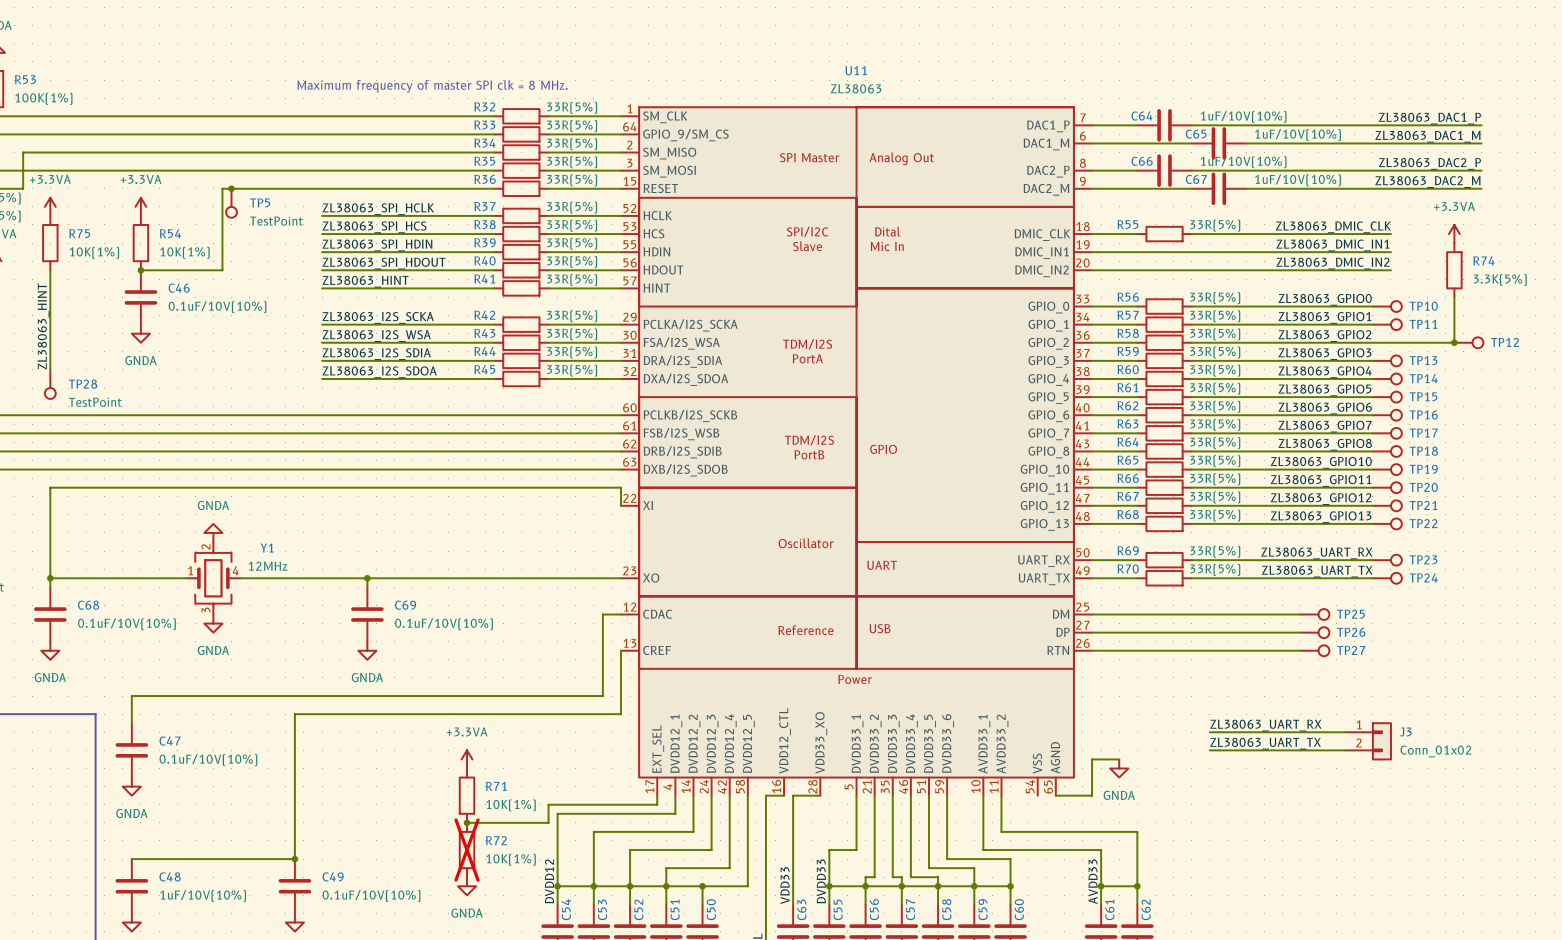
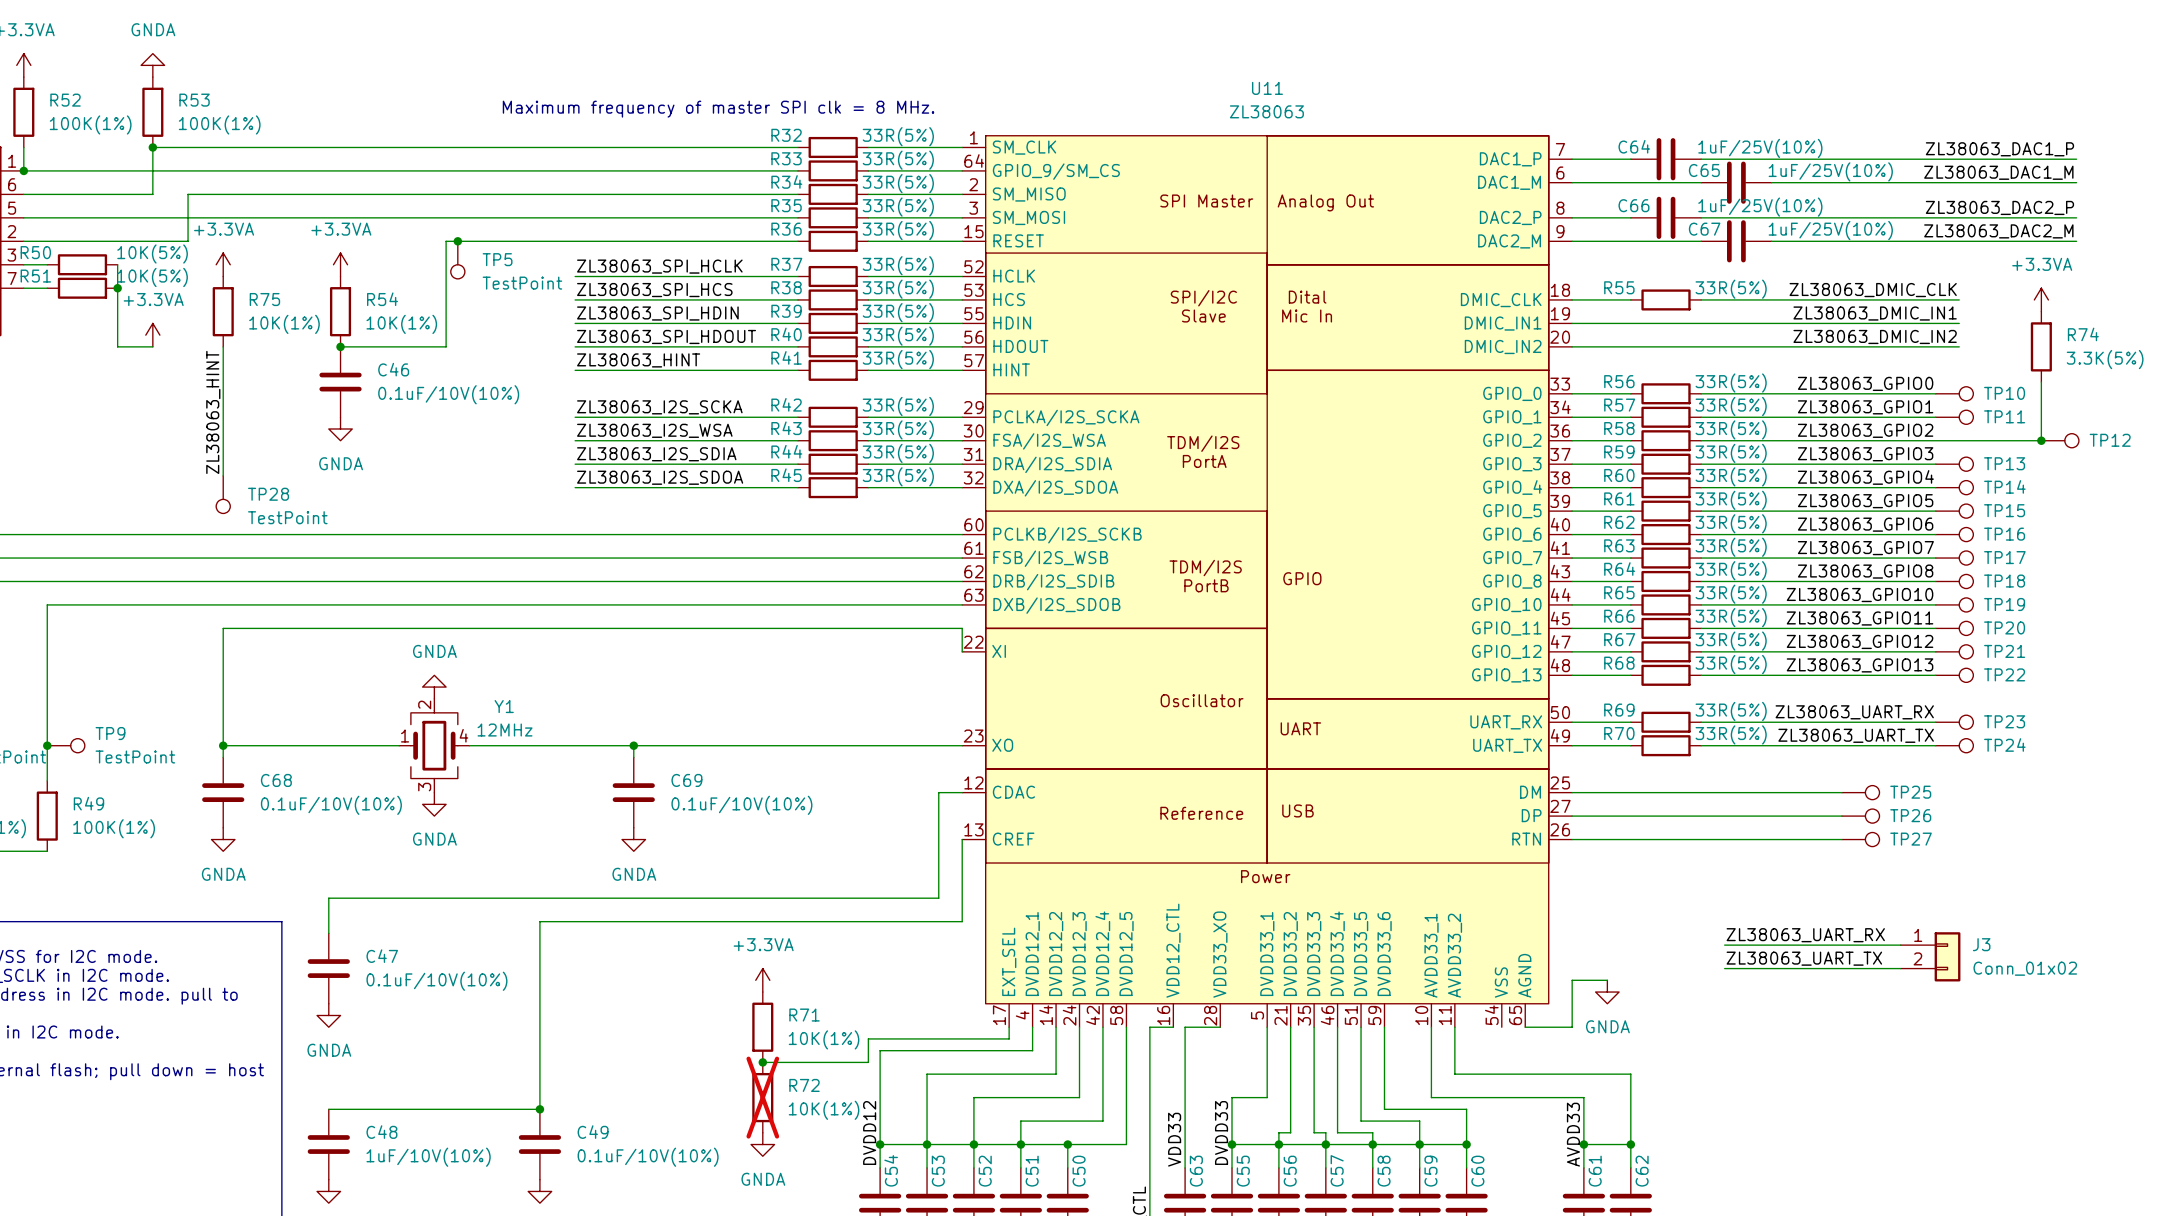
C64 value: 1uF/10V(10%) (1243, 116) -> 1uF/25V(10%) (1760, 148)
C65 value: 1uF/10V(10%) (1297, 135) -> 1uF/25V(10%) (1830, 171)
C66 value: 1uF/10V(10%) (1243, 162) -> 1uF/25V(10%) (1760, 207)
C67 value: 1uF/10V(10%) (1297, 180) -> 1uF/25V(10%) (1830, 230)

